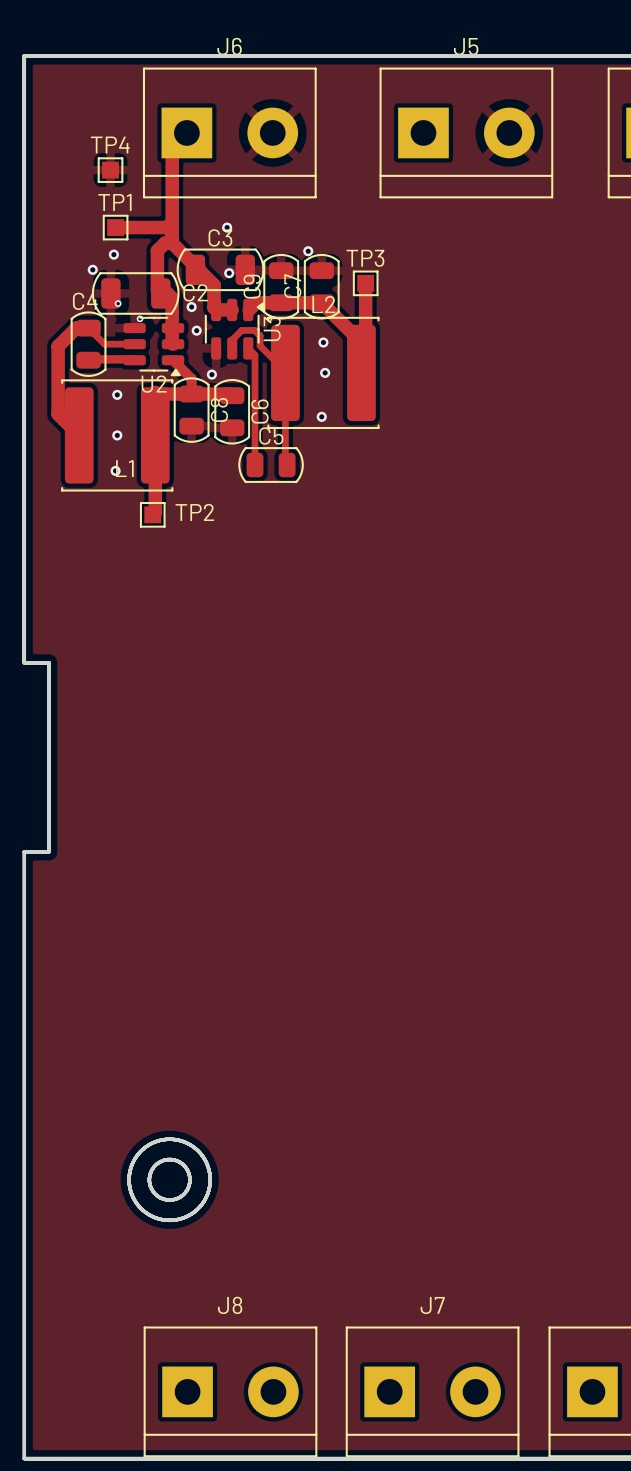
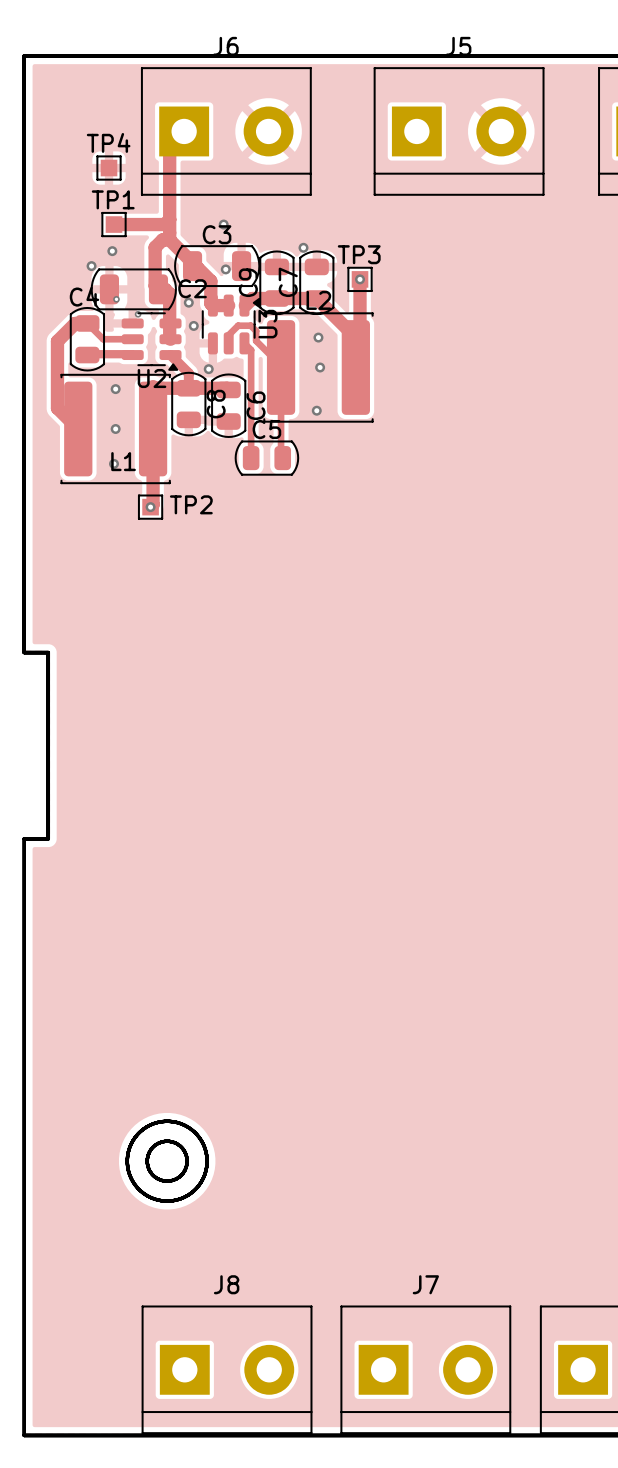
via: none -> (360, 279)
via: none -> (150, 507)

